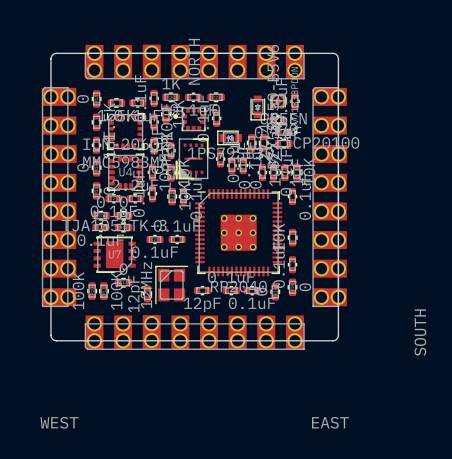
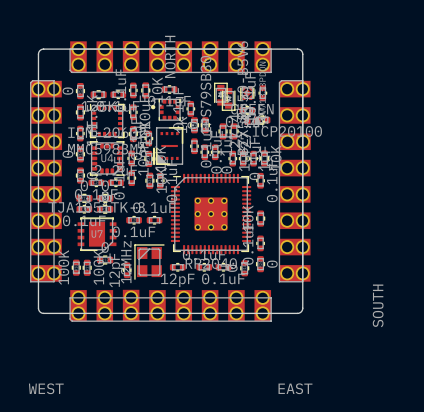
part rotation: 0° (171, 97) -> 90° clockwise (194, 125)
part position: (171, 97) -> (194, 125)
part rotation: 0° (216, 97) -> 90° clockwise (205, 125)
part position: (216, 97) -> (205, 125)
part position: (165, 114) -> (145, 90)
part rotation: 0° (229, 137) -> 90° clockwise (220, 94)
part position: (229, 137) -> (220, 94)
part position: (283, 143) -> (262, 120)

